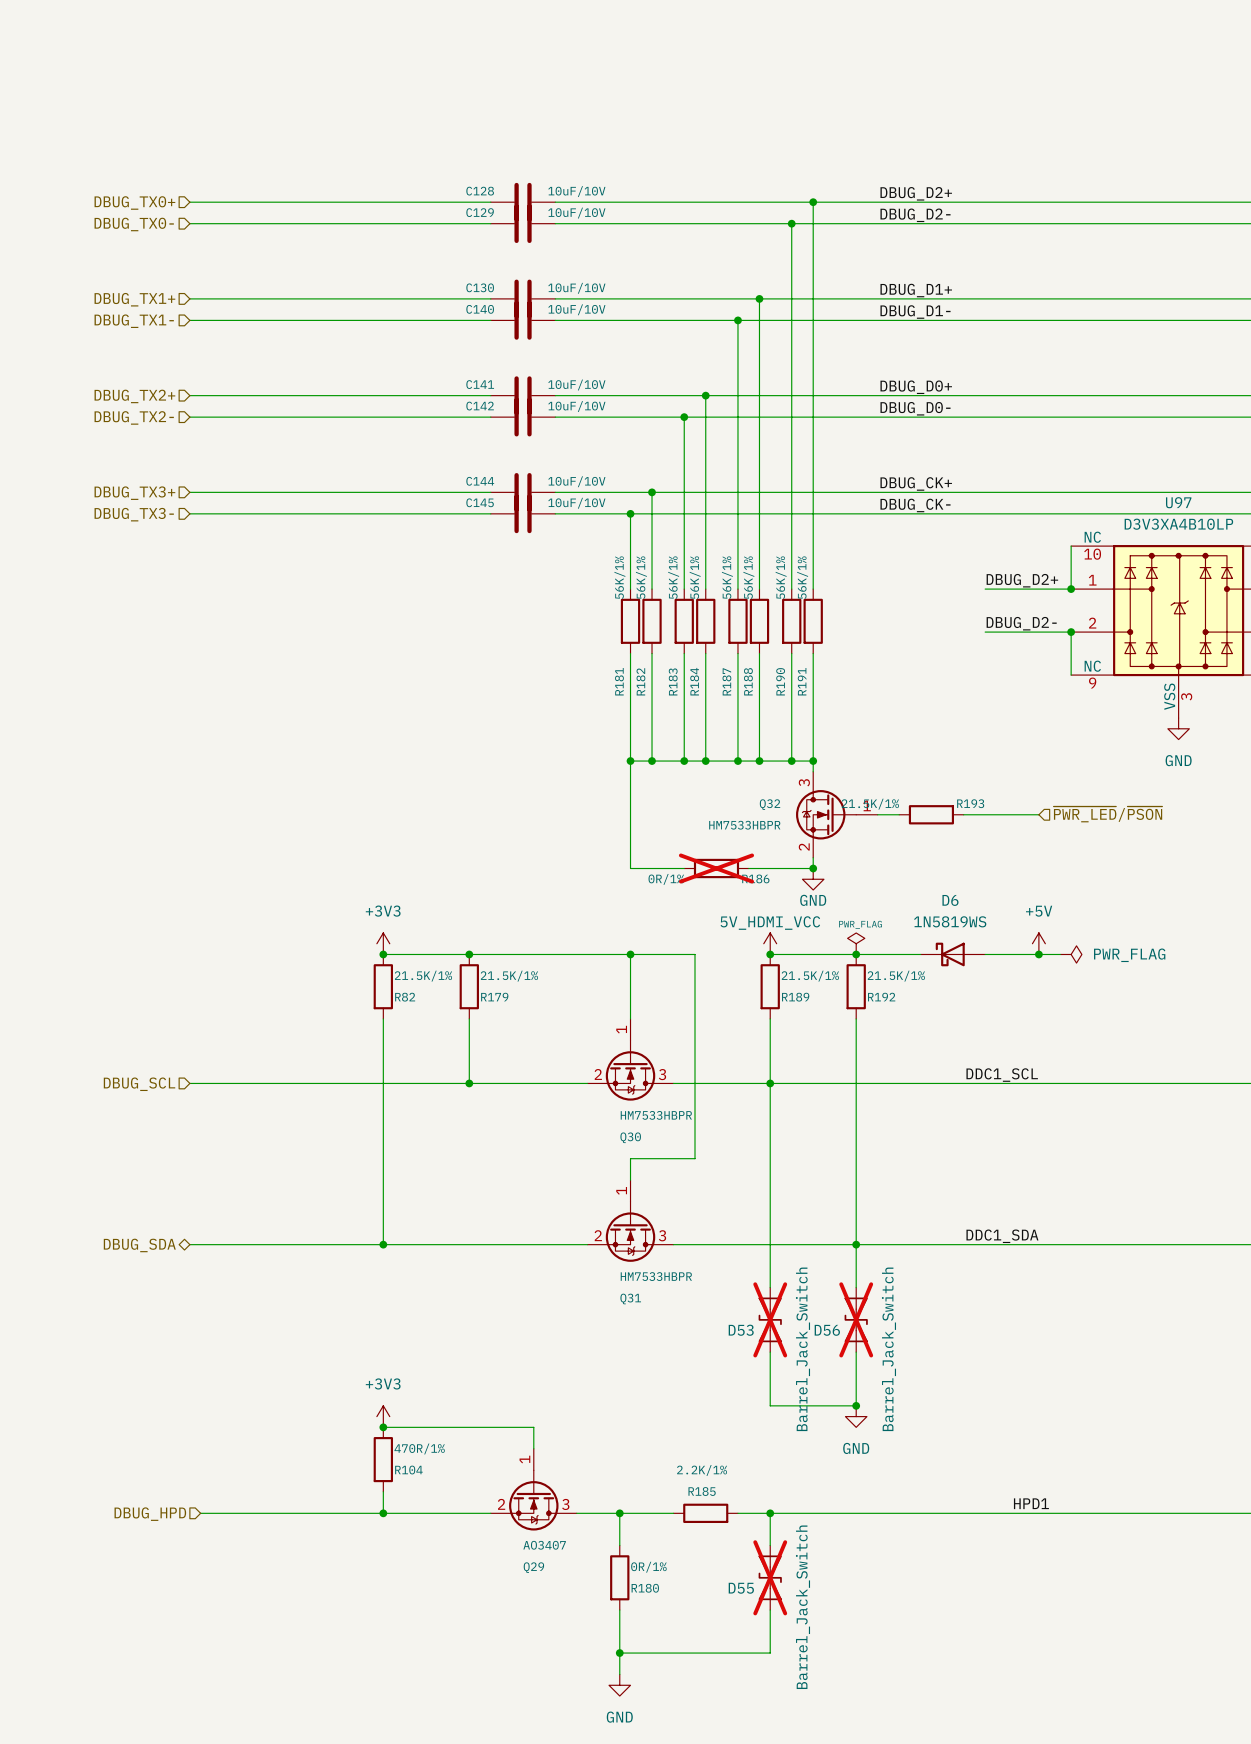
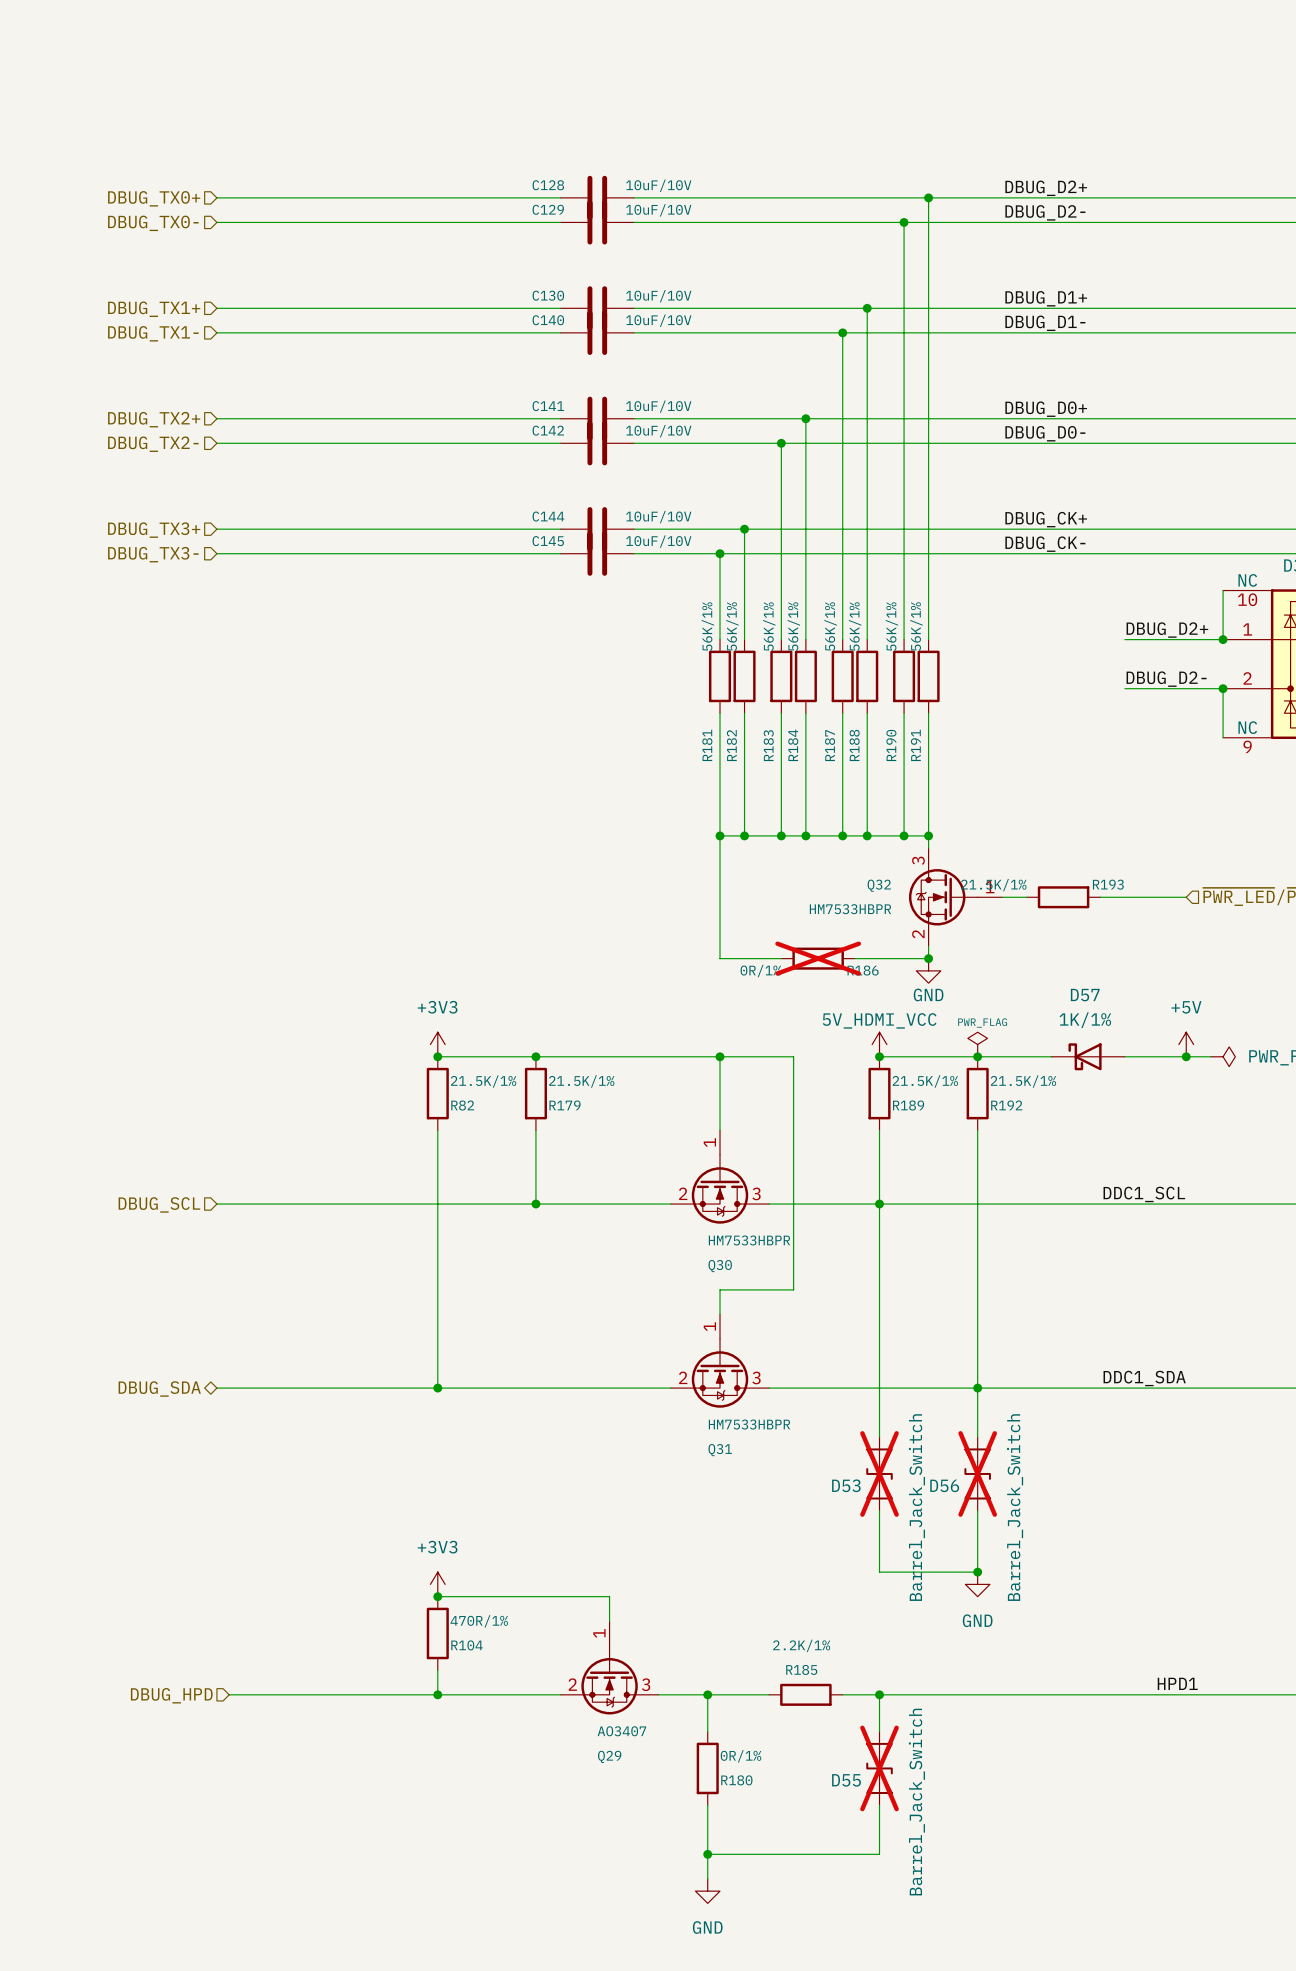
D6 name: D6 (950, 900) -> D57 (1085, 995)
D6 value: 1N5819WS (950, 921) -> 1K/1% (1085, 1020)

